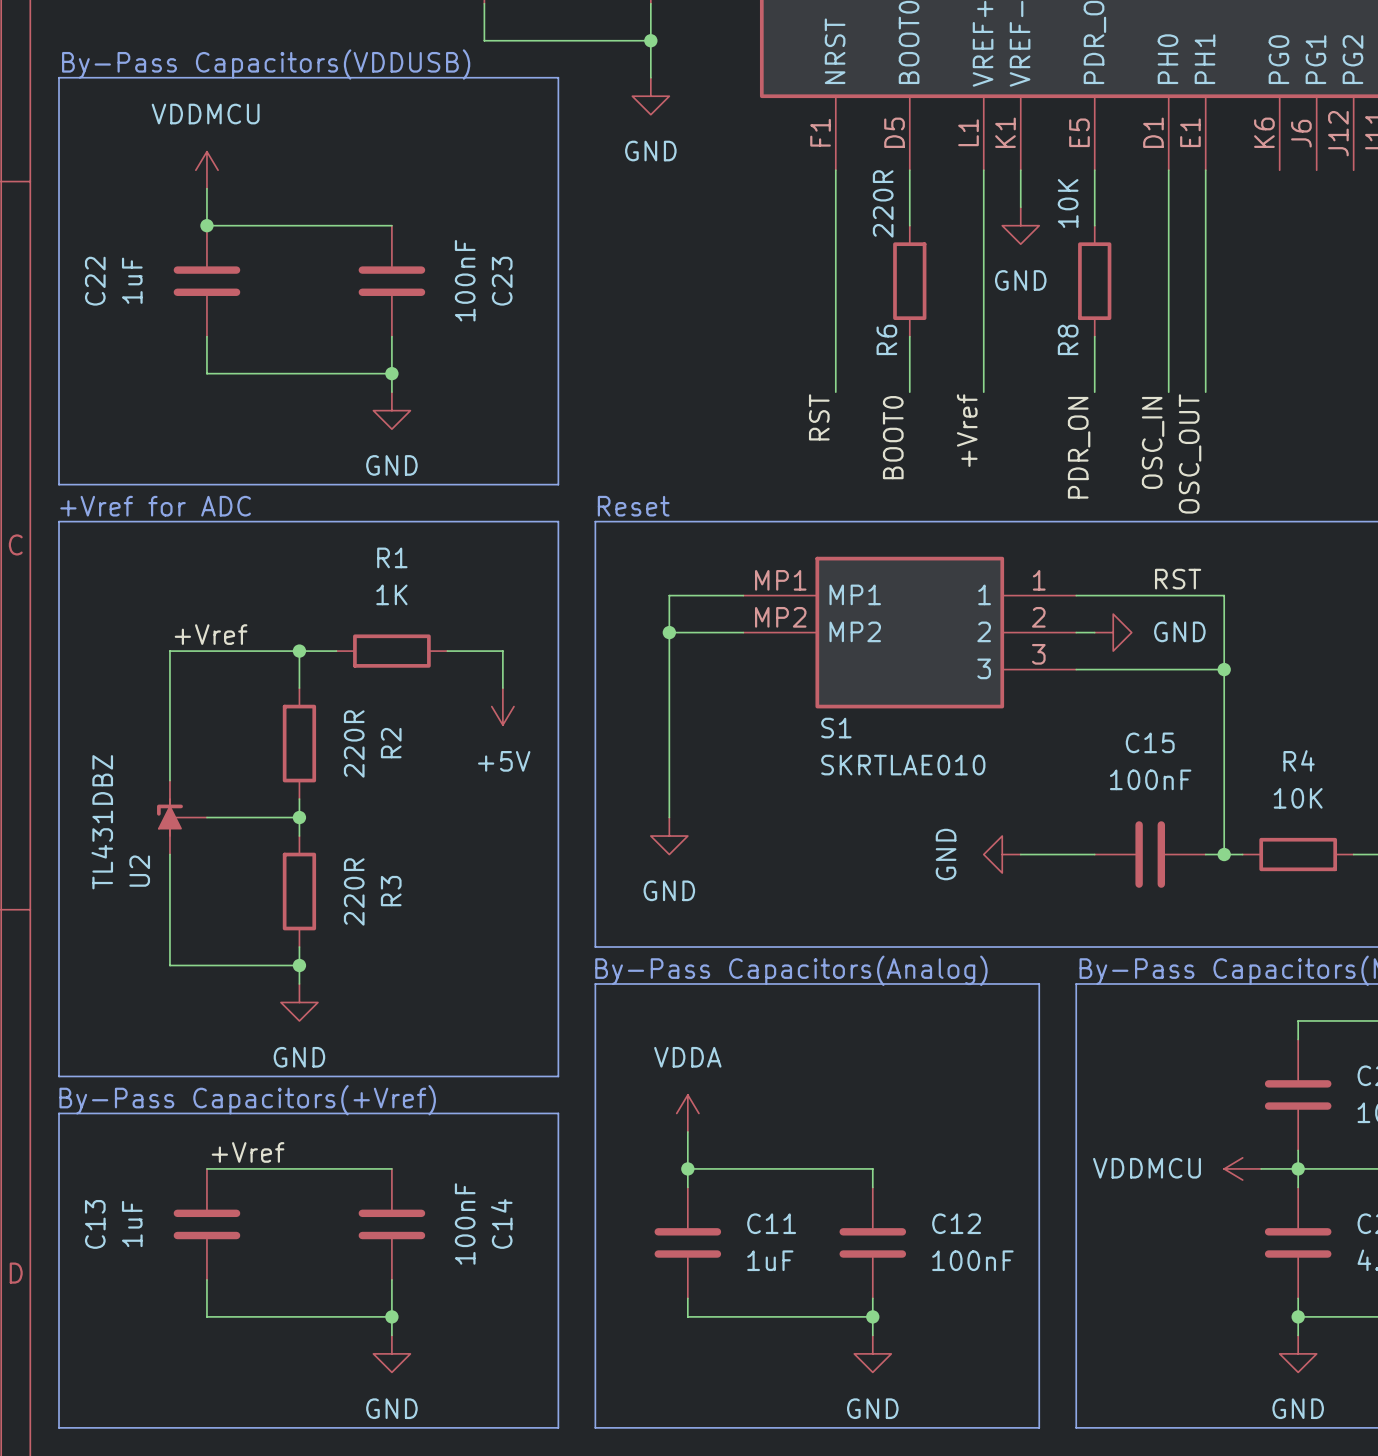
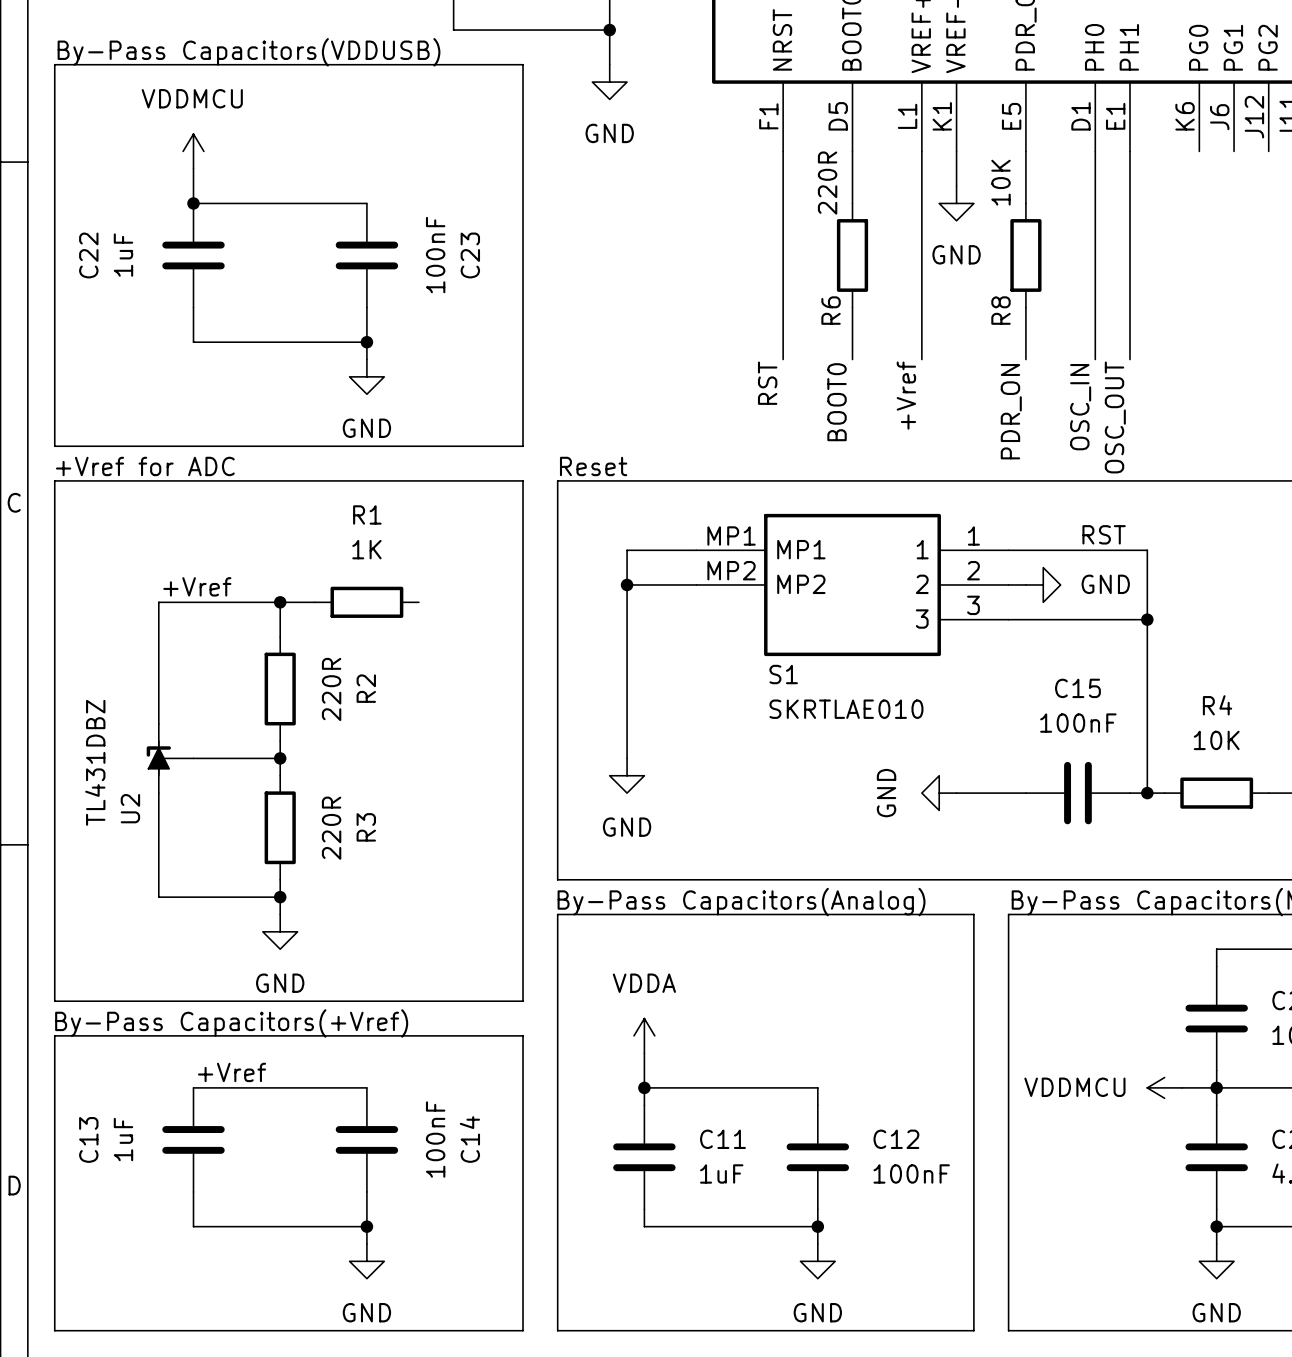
wire: (447, 651) (502, 651) (502, 688) -> none
power symbol: +5V (502, 706) -> none

